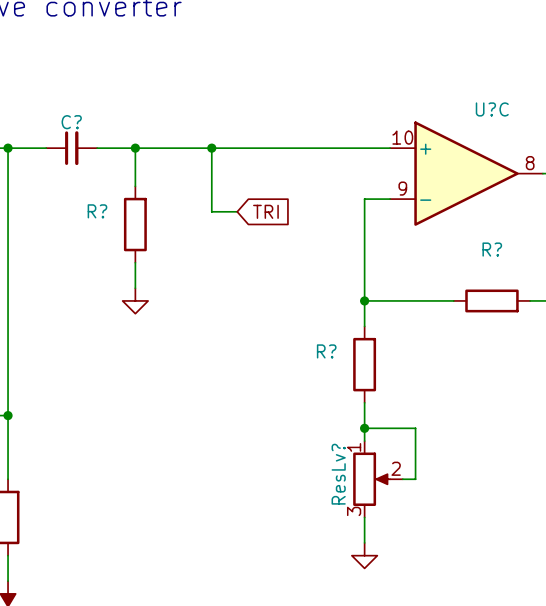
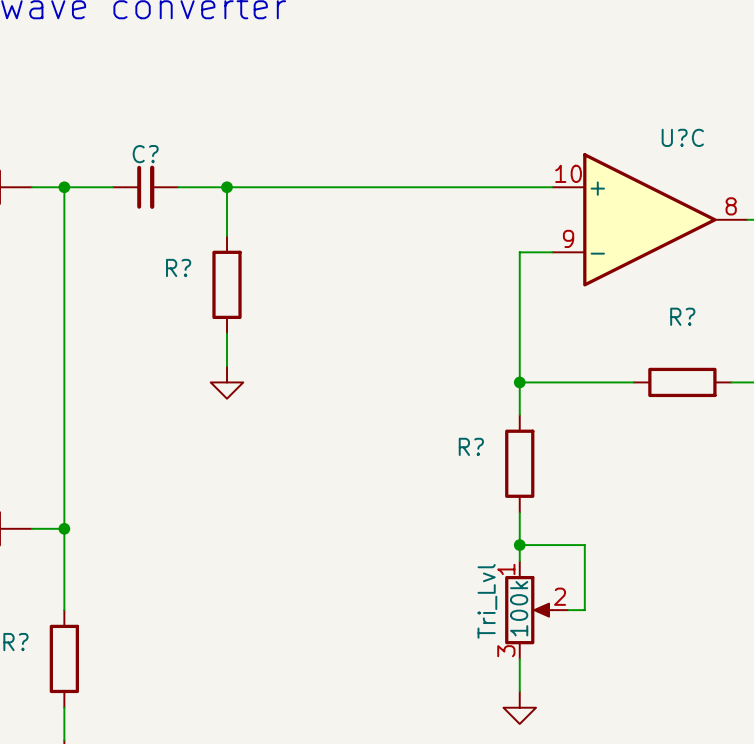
wire: (211, 148) (211, 211) (237, 211) -> none
junction: (211, 148) -> none
global label: TRI (265, 211) -> none
ResLv? name: ResLv? (338, 474) -> Tri_Lvl (487, 601)
ResLv? value: none -> 100k (519, 608)

